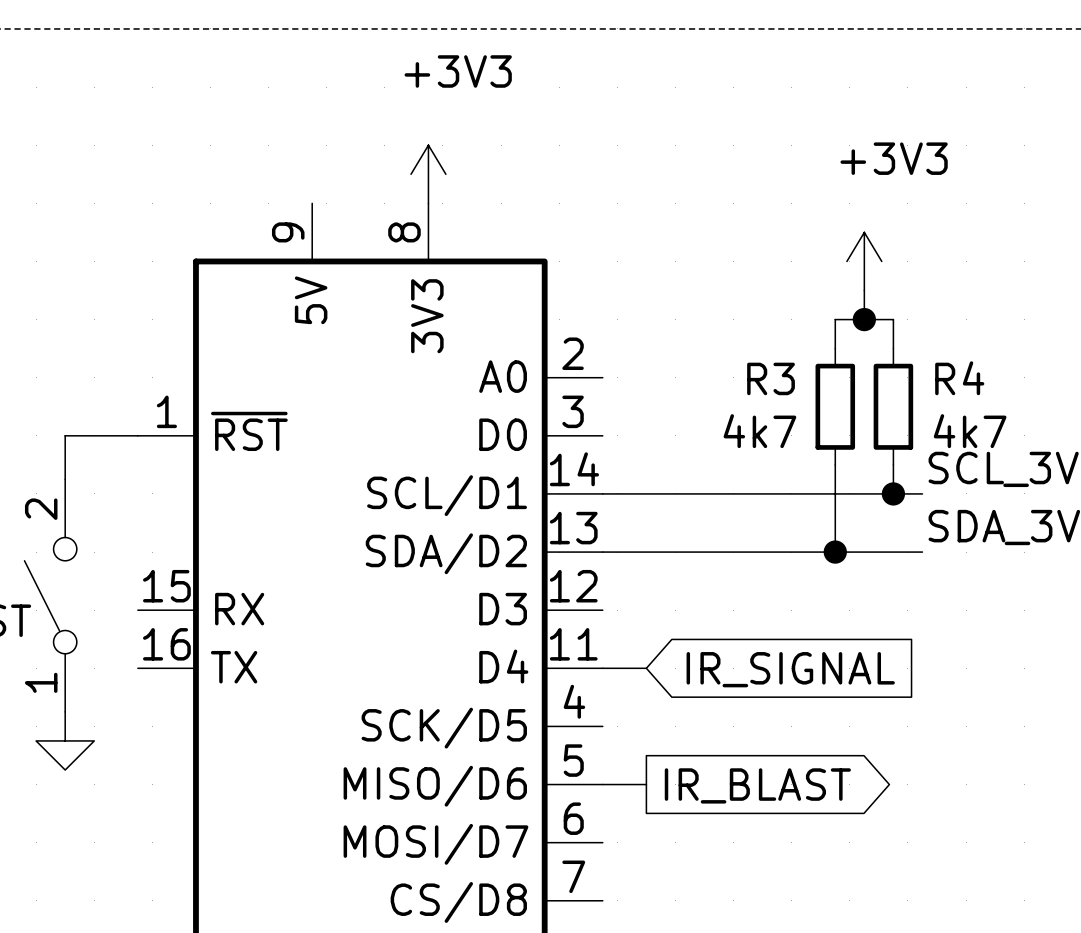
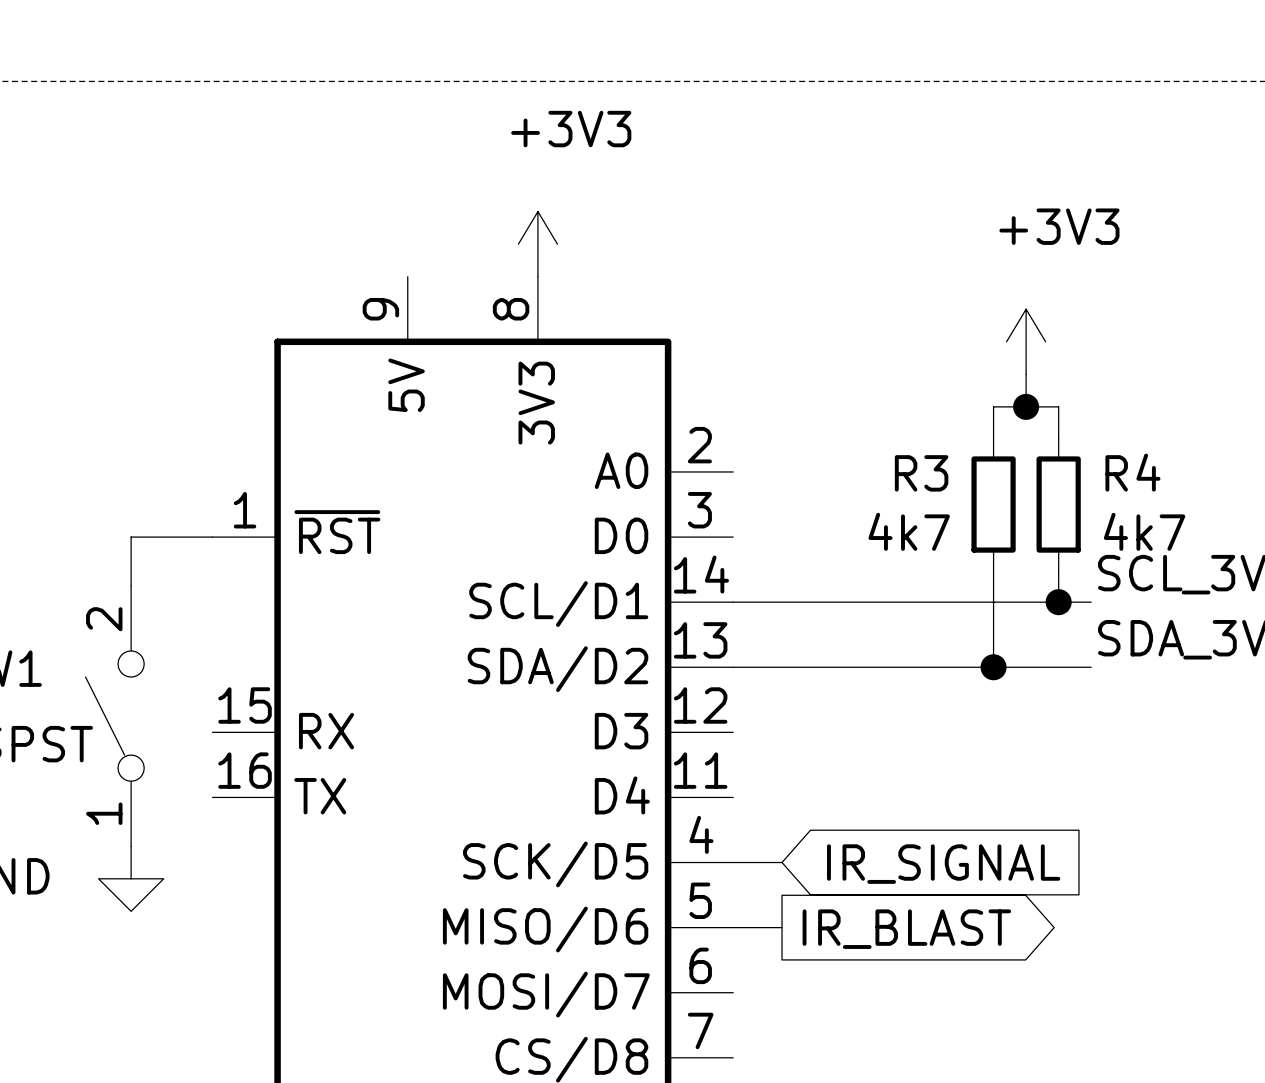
wire: (602, 668) (646, 668) -> (733, 862) (782, 862)
global label position: IR_SIGNAL (790, 669) -> IR_SIGNAL (943, 864)

